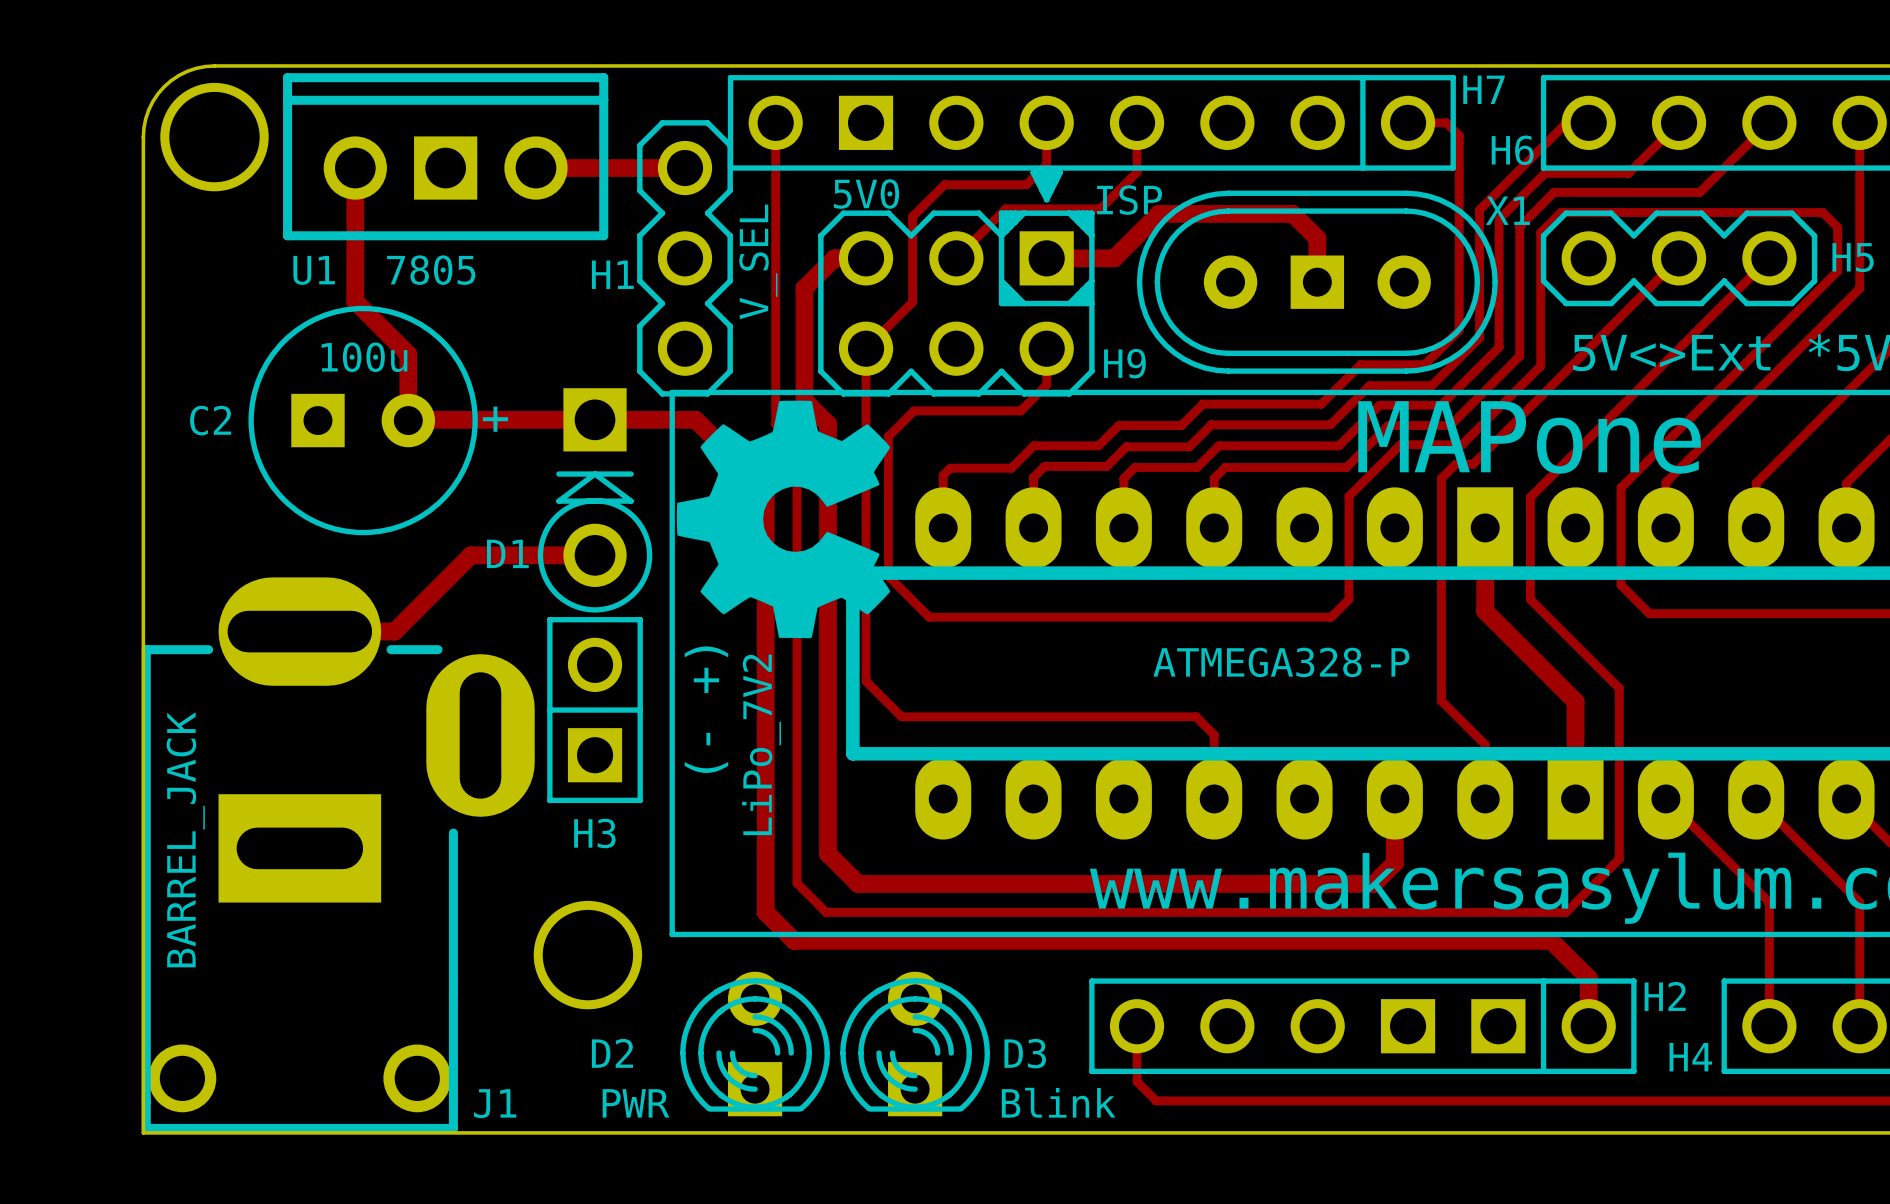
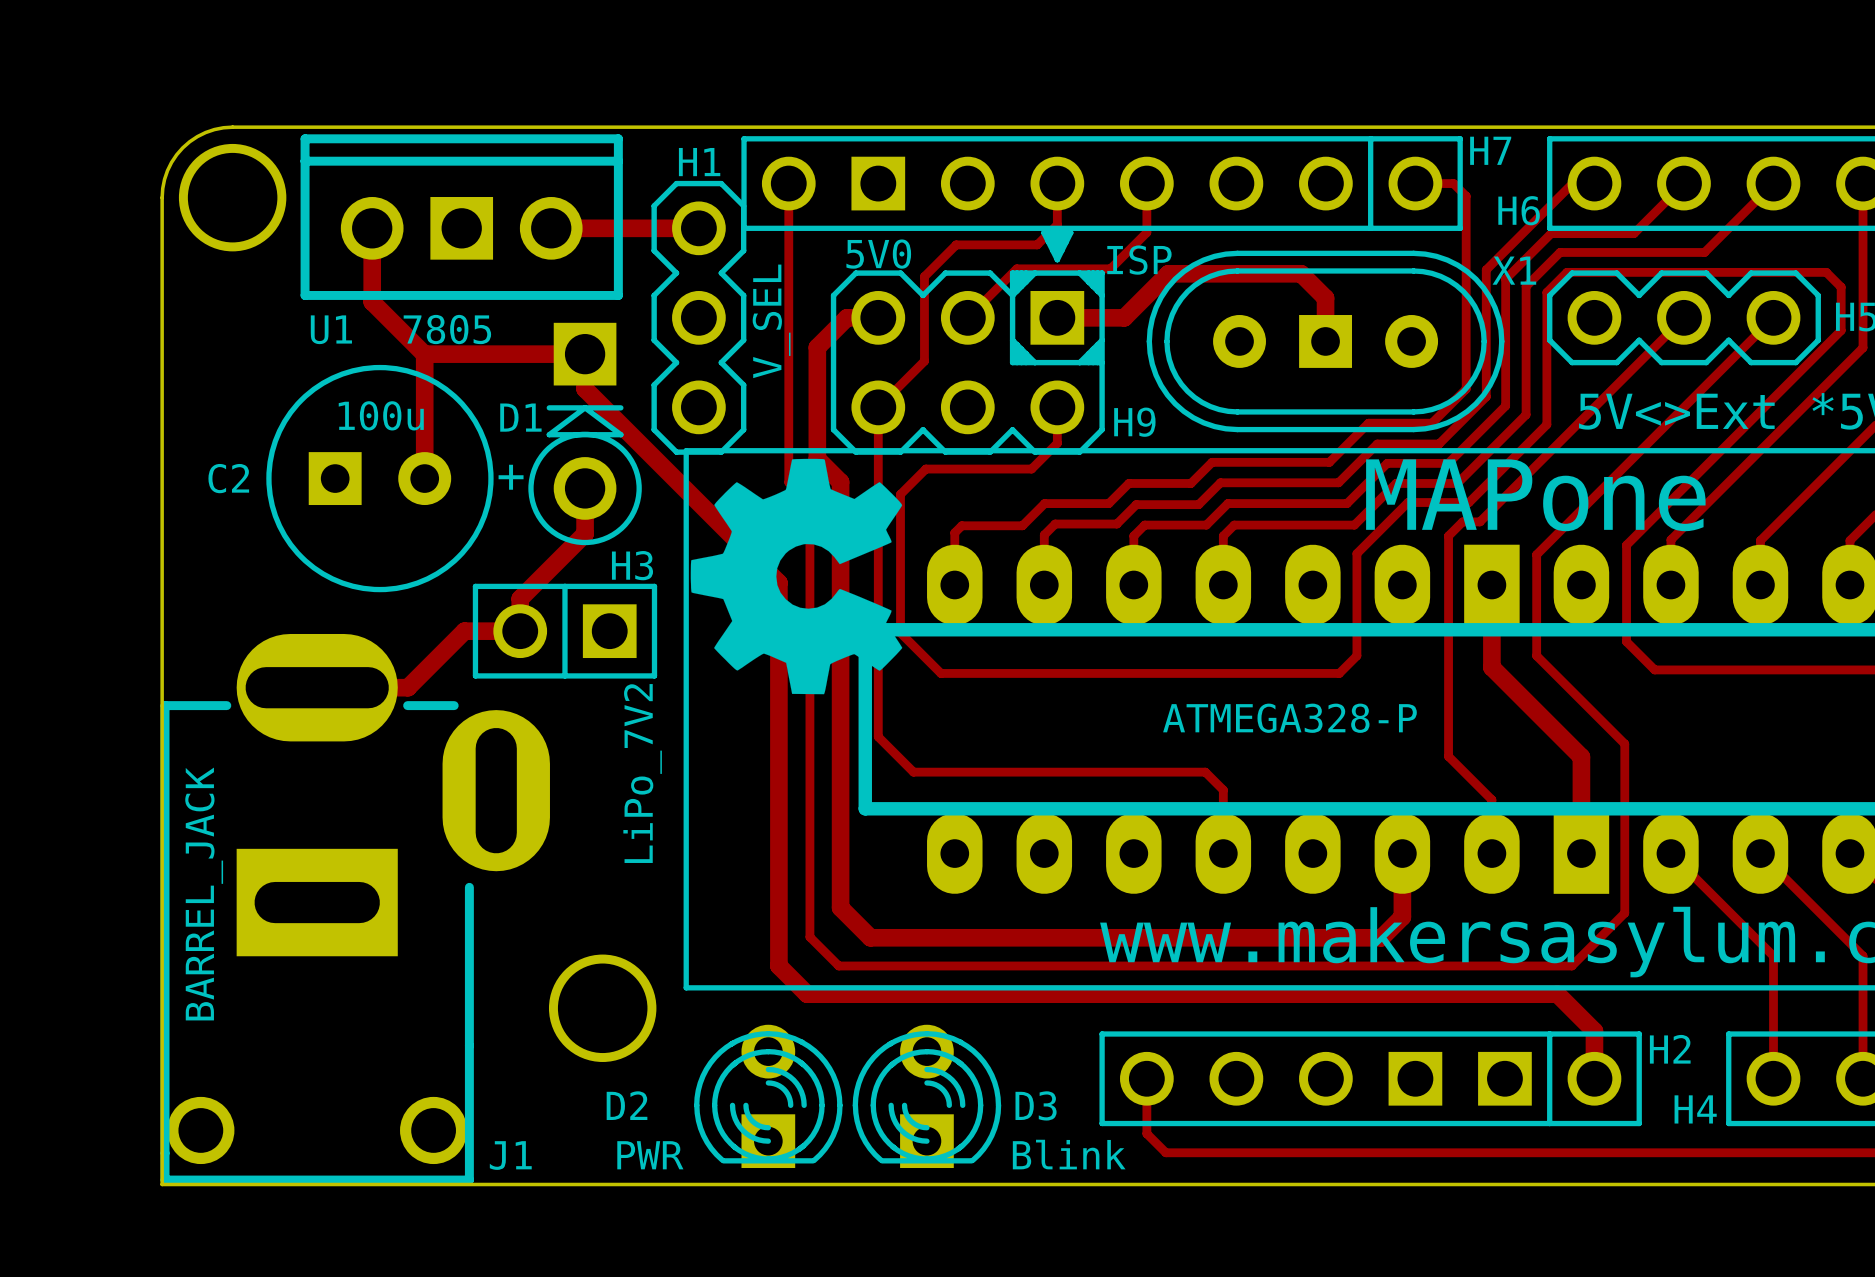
track: (355, 242) (355, 301) (408, 354) -> (372, 301) (424, 354)
H1 name position: H1 (612, 274) -> H1 (699, 162)
track: (409, 419) (695, 419) (765, 489) (765, 525) -> (424, 413) (424, 354) (585, 354) (585, 389) (778, 582)
D1 position: (595, 500) -> (585, 433)
D1 name position: D1 (507, 553) -> D1 (520, 417)
track: (595, 555) (470, 555) (394, 631) (391, 631) -> (585, 488) (585, 533) (520, 598) (520, 631) (464, 631) (408, 687)
text: (- +) (706, 709) -> none
H3 rotation: 0° (595, 710) -> 90° counterclockwise (564, 631)
H3 position: (595, 710) -> (564, 631)
H3 value position: LiPo_7V2 (761, 744) -> LiPo_7V2 (642, 773)
H3 name position: H3 (594, 833) -> H3 (632, 565)

